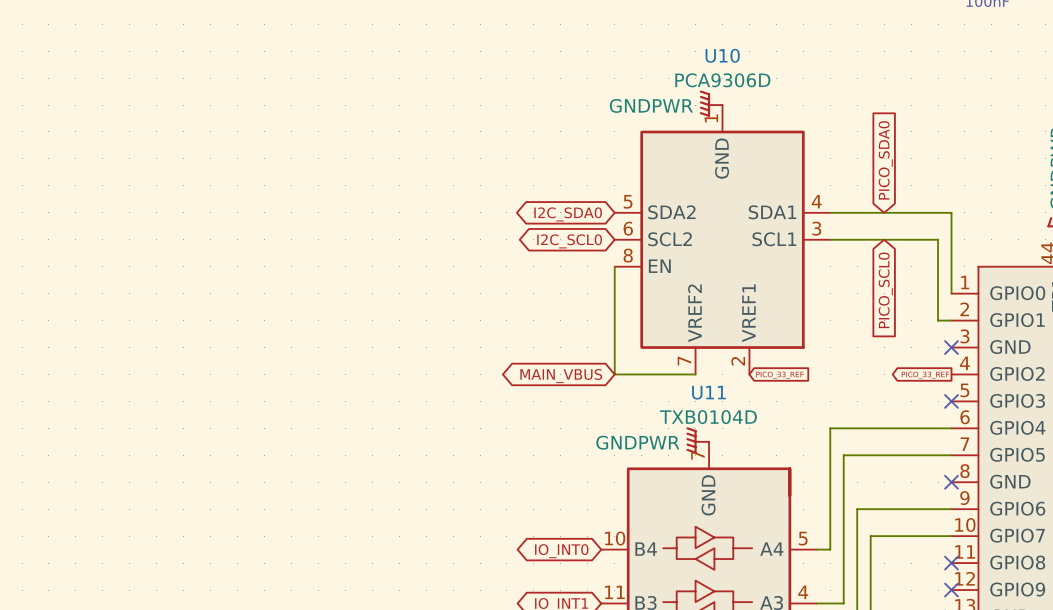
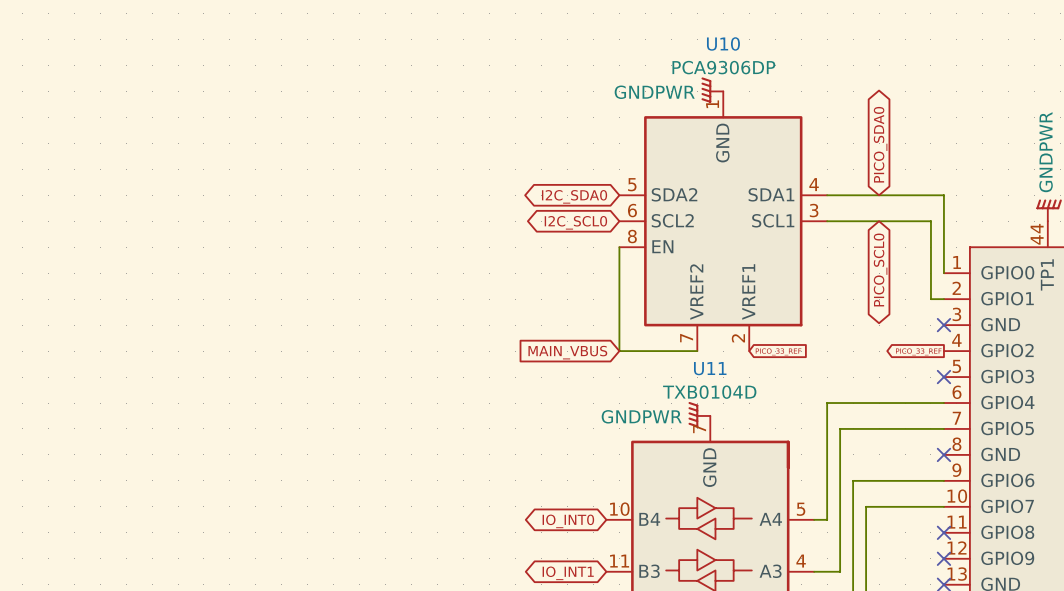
U10 value: PCA9306D (722, 80) -> PCA9306DP (723, 67)
global label shape: input (885, 160) -> bidirectional (880, 144)
global label shape: input (885, 290) -> bidirectional (880, 269)
global label shape: bidirectional (561, 376) -> input (567, 352)

